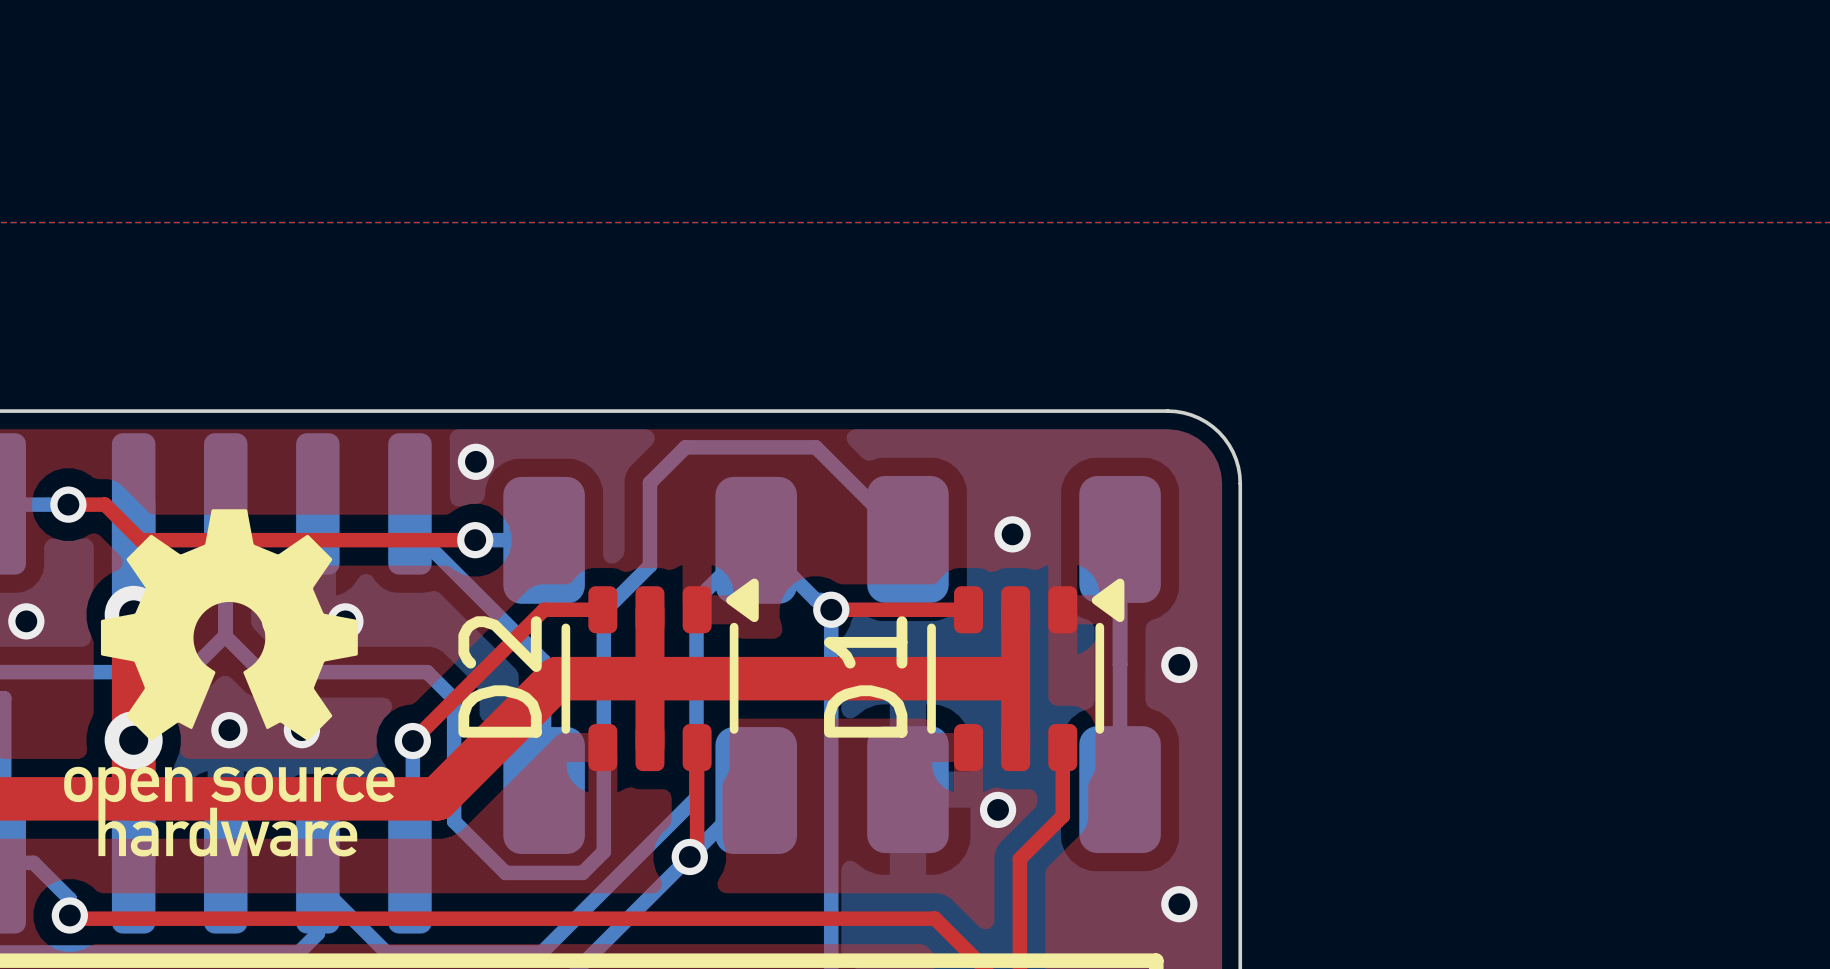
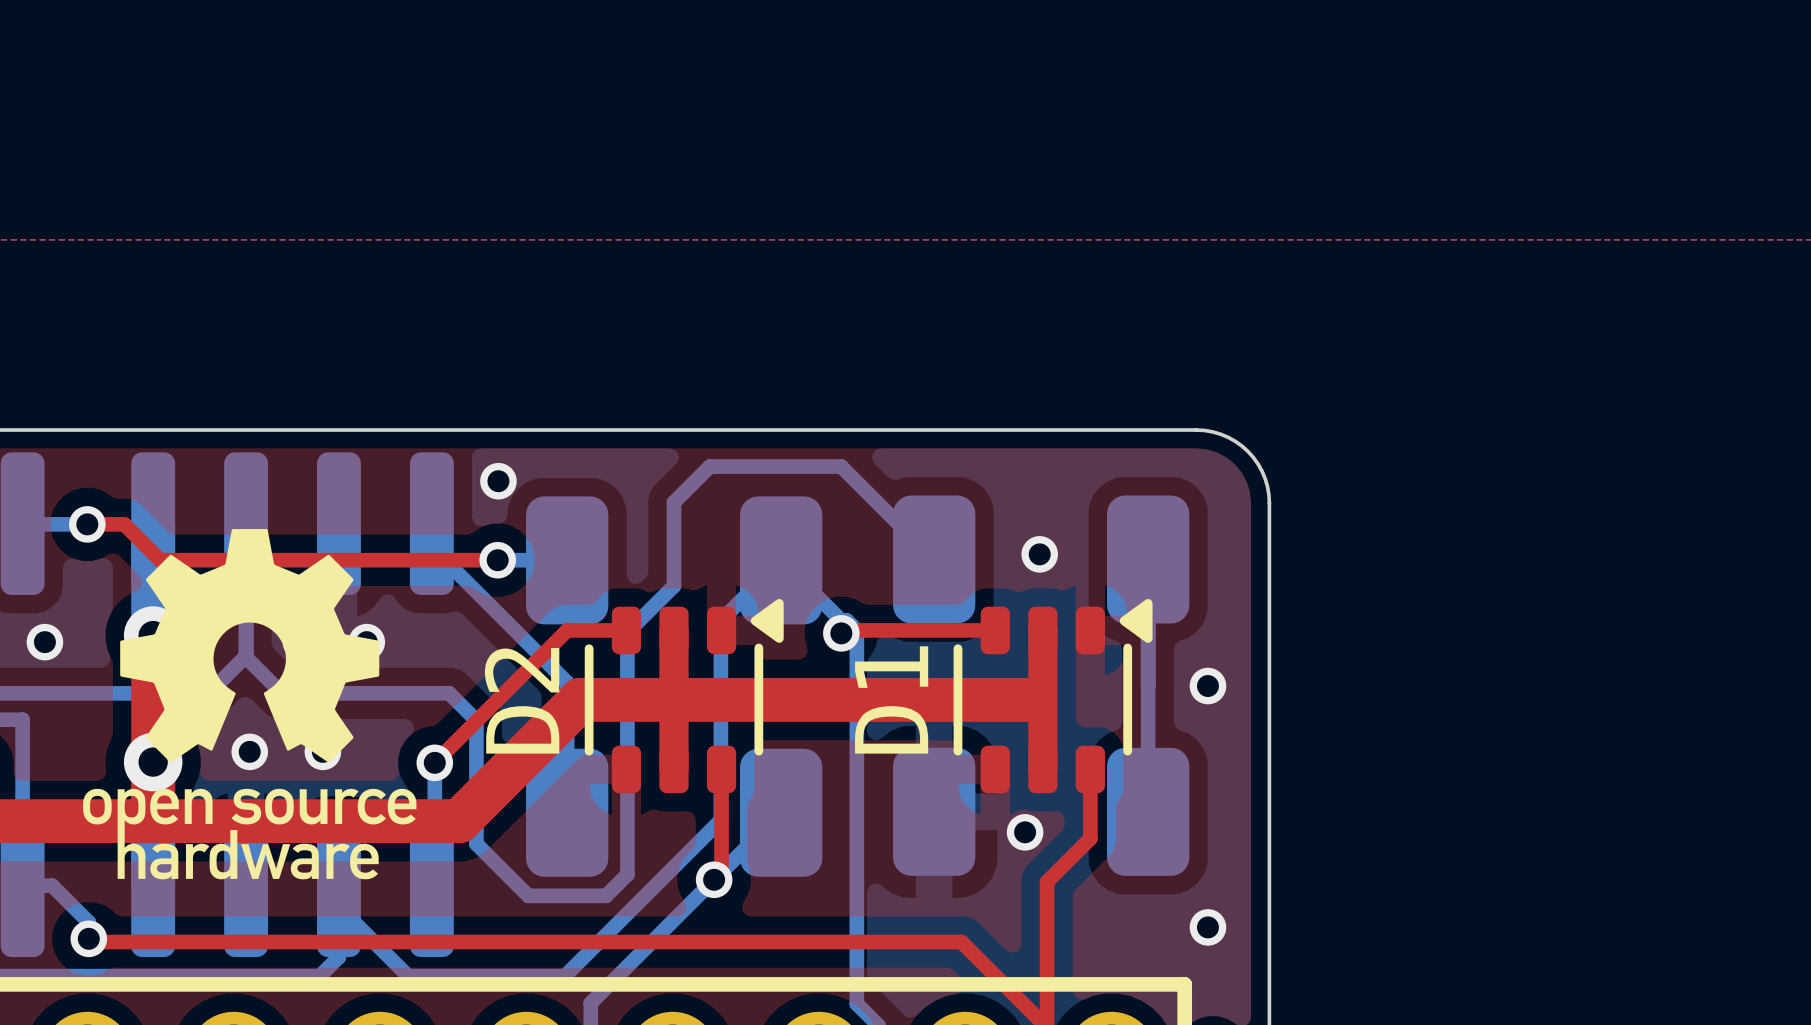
via position: (831, 609) -> (841, 633)

